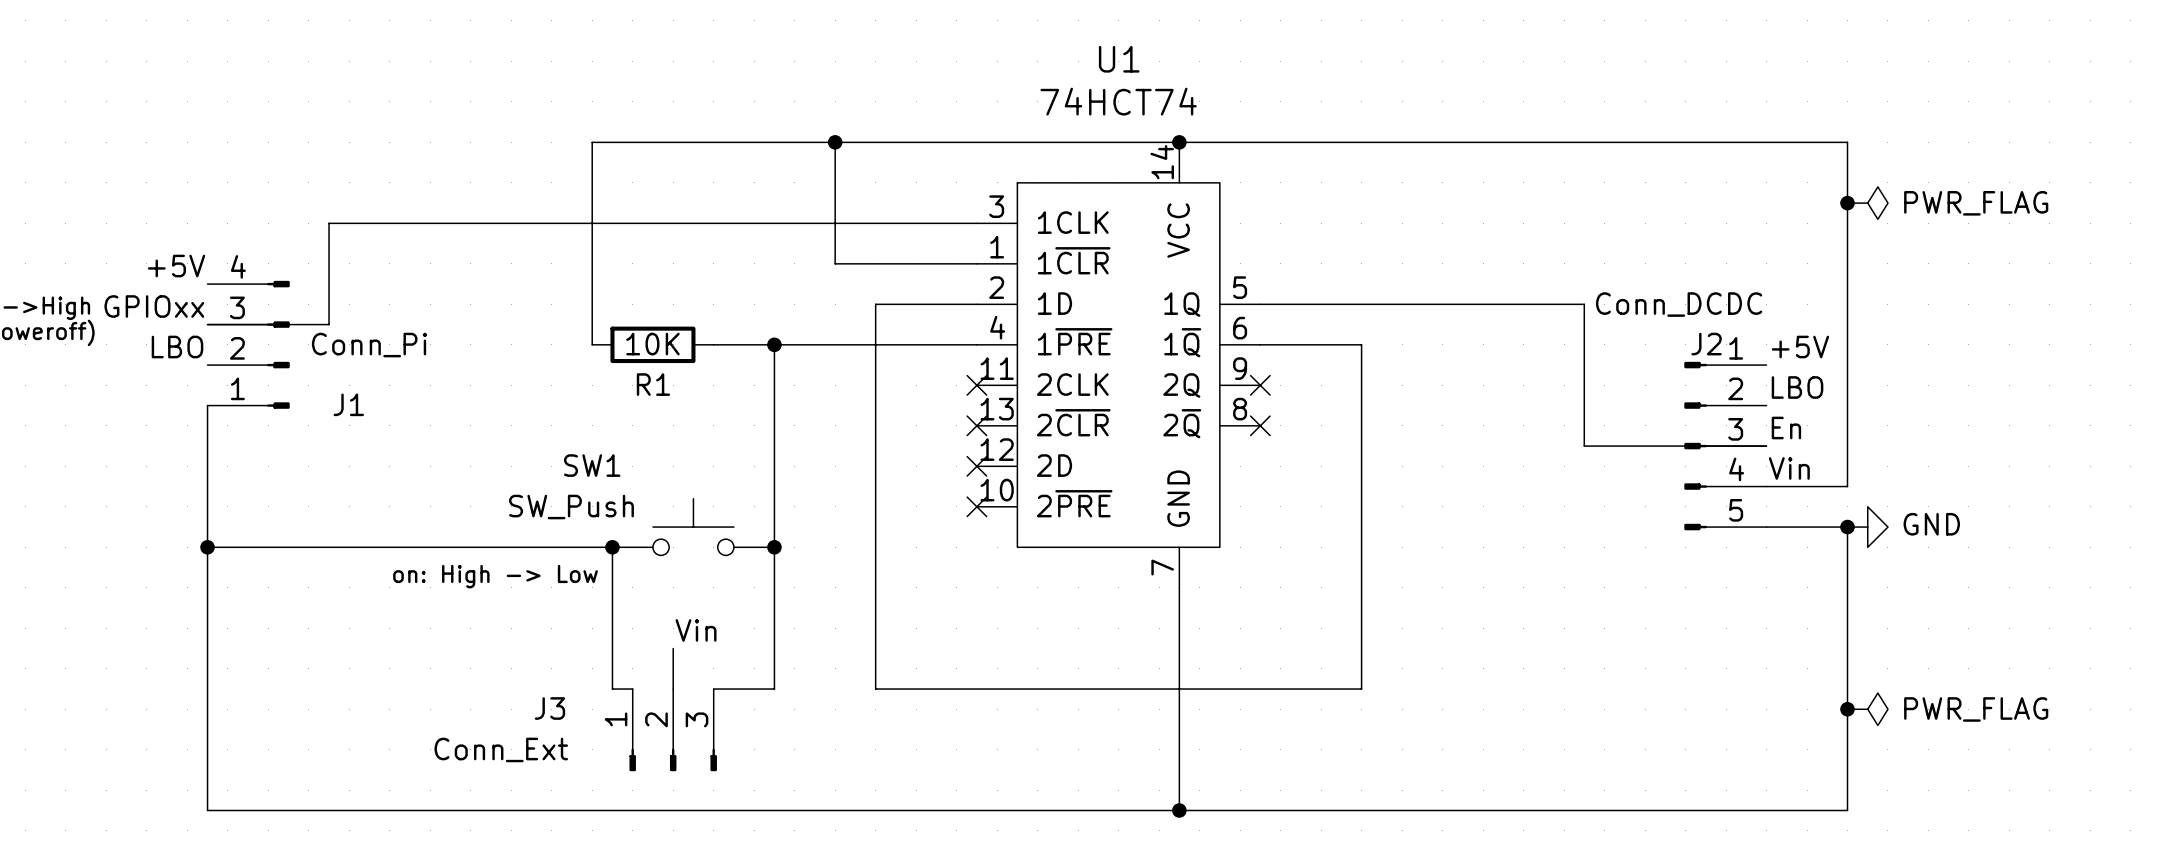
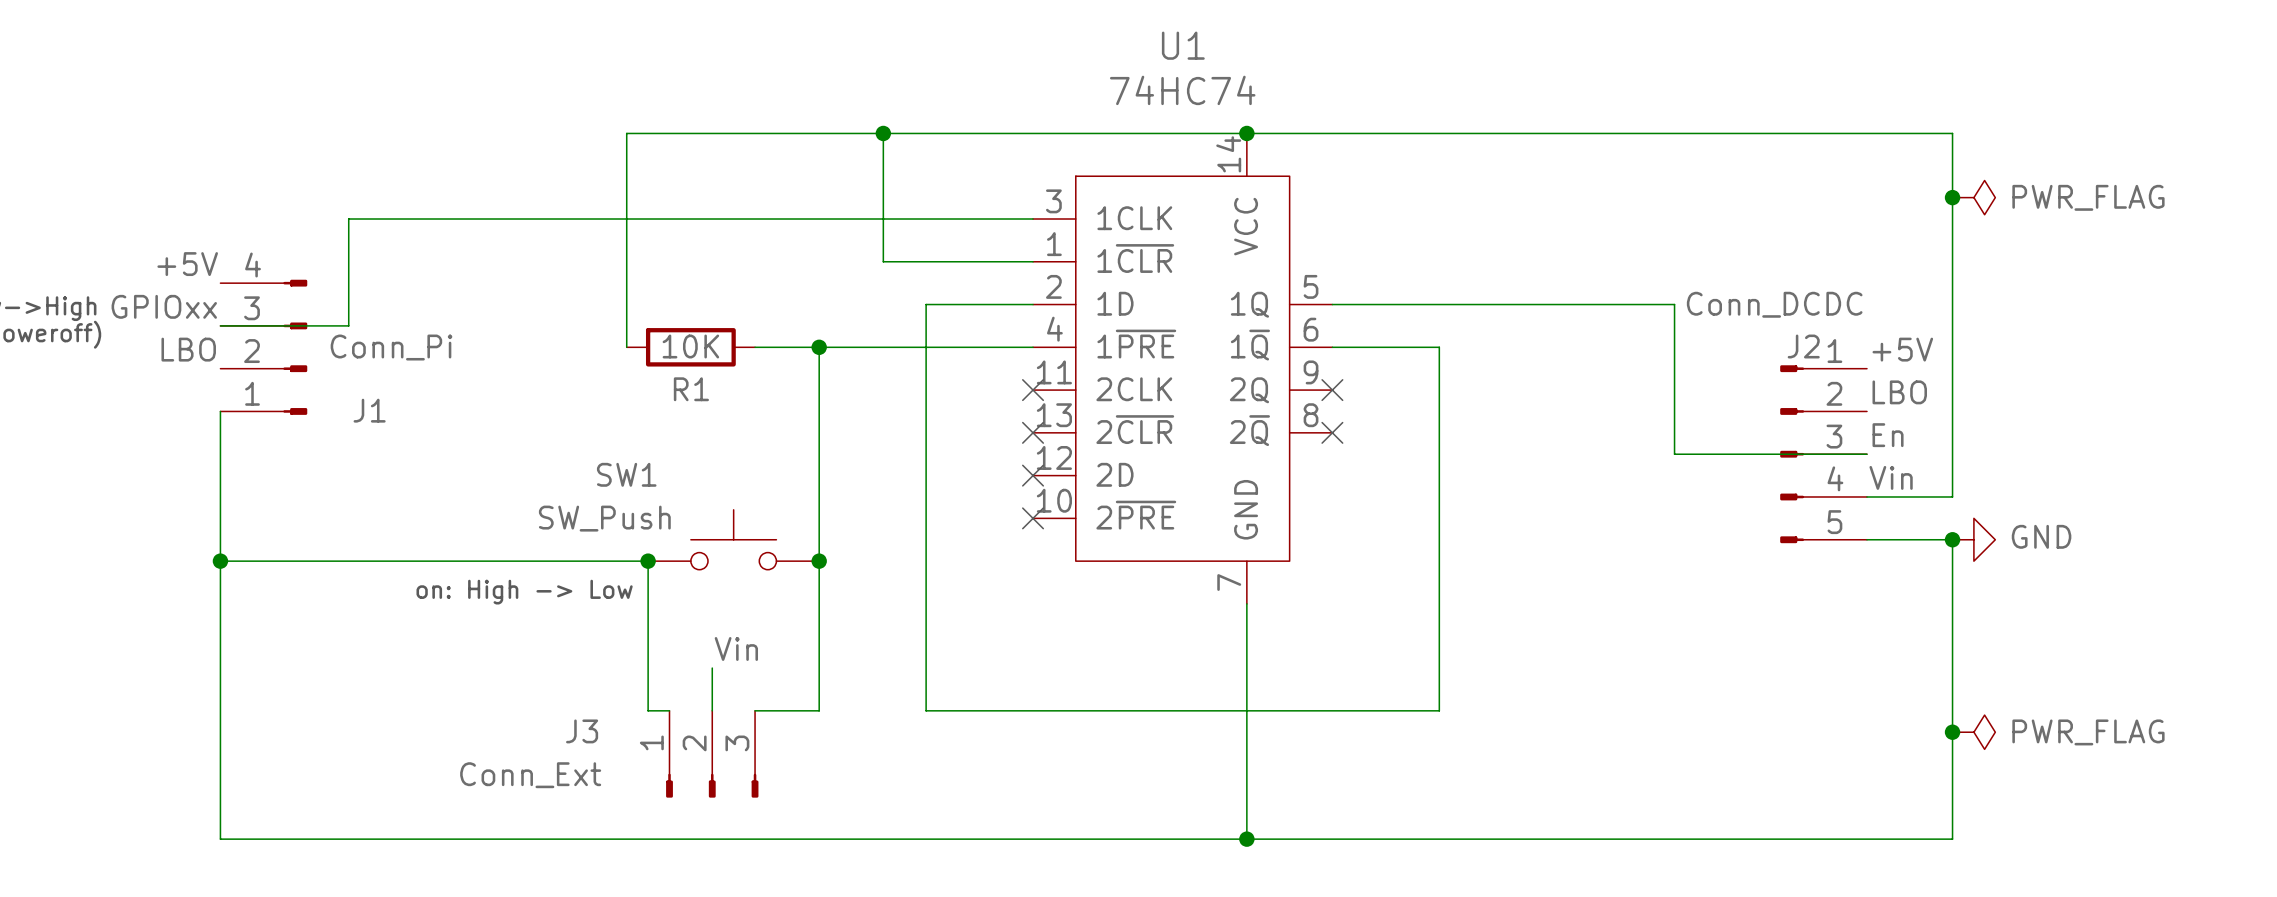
U1 value: 74HCT74 (1118, 101) -> 74HC74 (1182, 90)

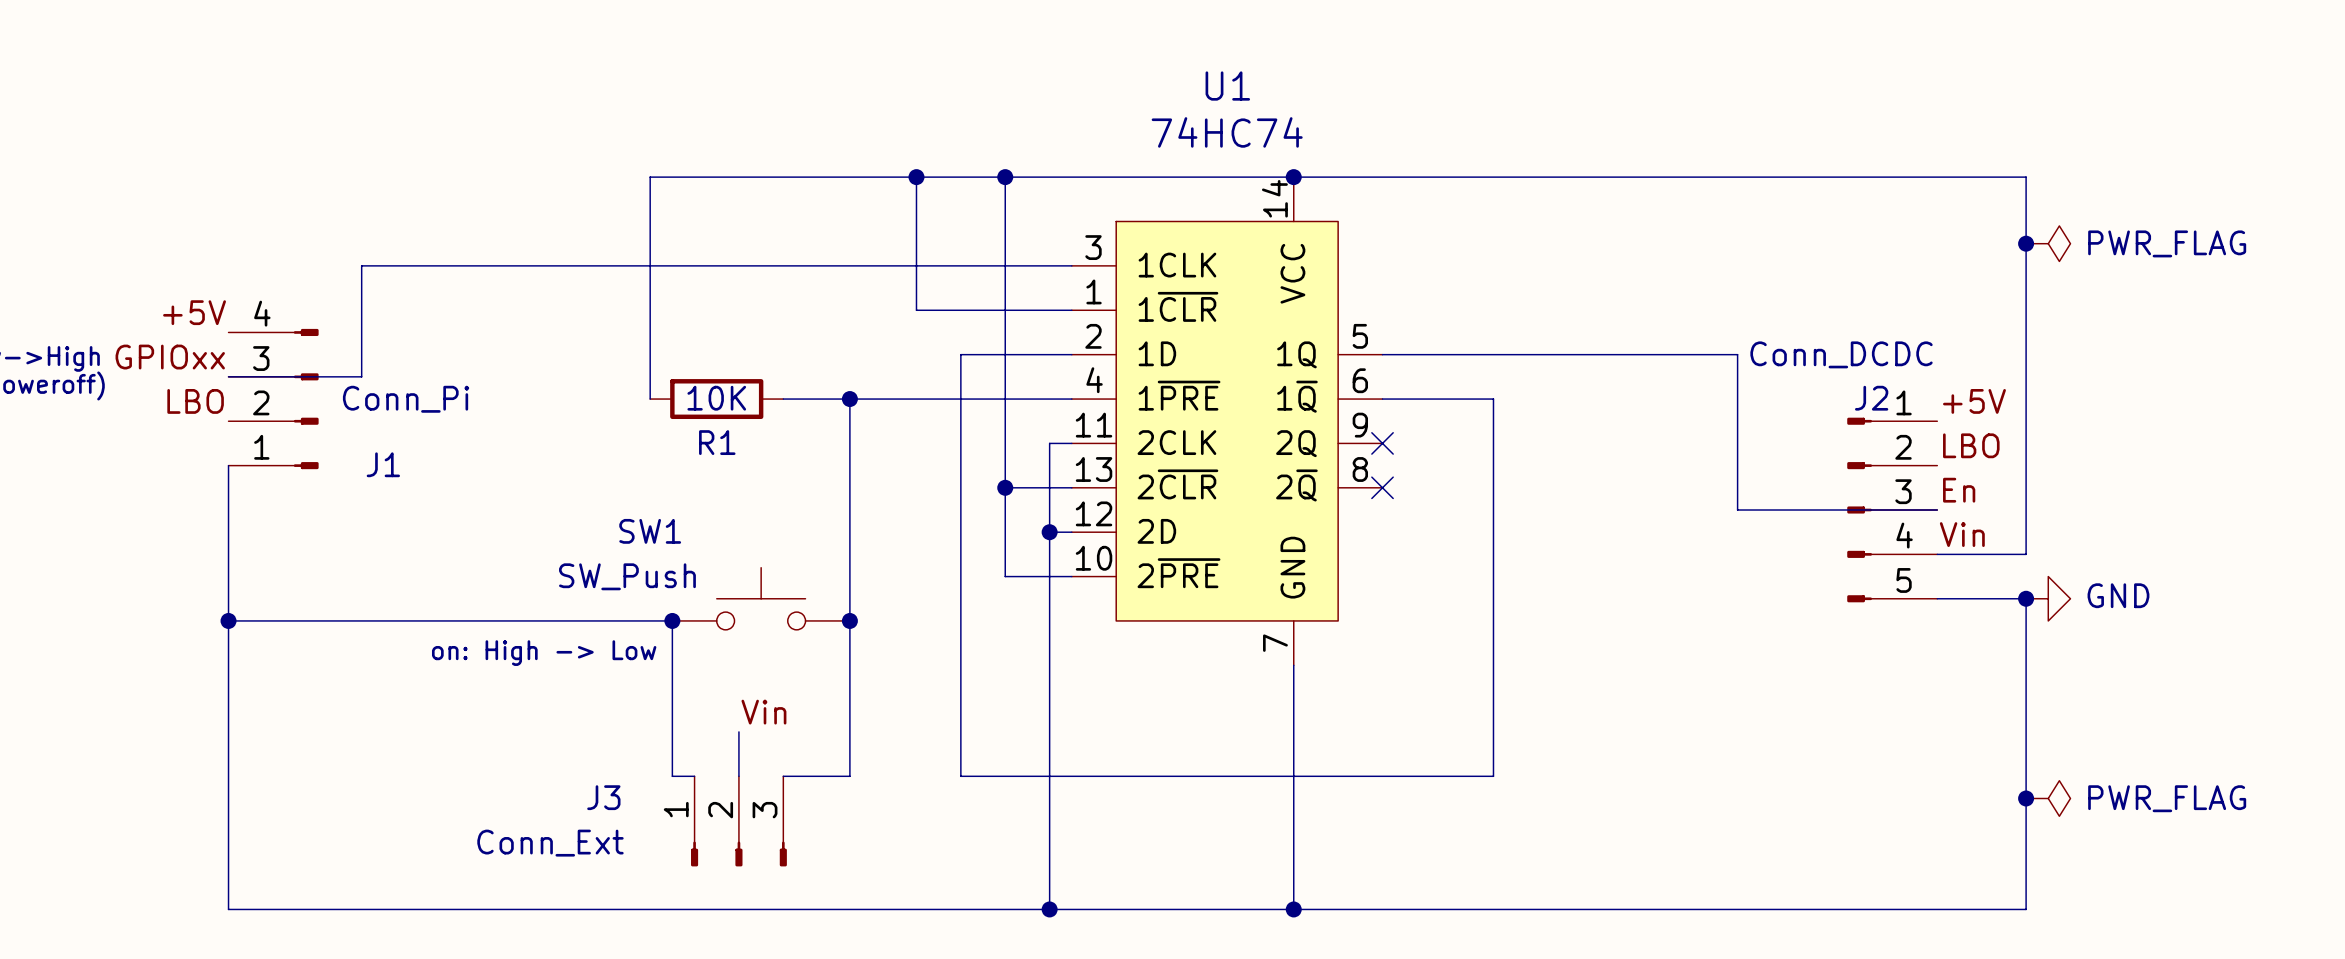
wire: none -> (1005, 177) (1005, 576) (1071, 576)
junction: none -> (1005, 177)
wire: none -> (1071, 443) (1049, 443) (1049, 909)
no-connect mark: (1033, 390) -> none
wire: none -> (1005, 487) (1071, 487)
junction: none -> (1005, 487)
no-connect mark: (1033, 432) -> none
wire: none -> (1049, 532) (1071, 532)
junction: none -> (1049, 532)
no-connect mark: (1033, 475) -> none
no-connect mark: (1033, 518) -> none
junction: none -> (1049, 909)

